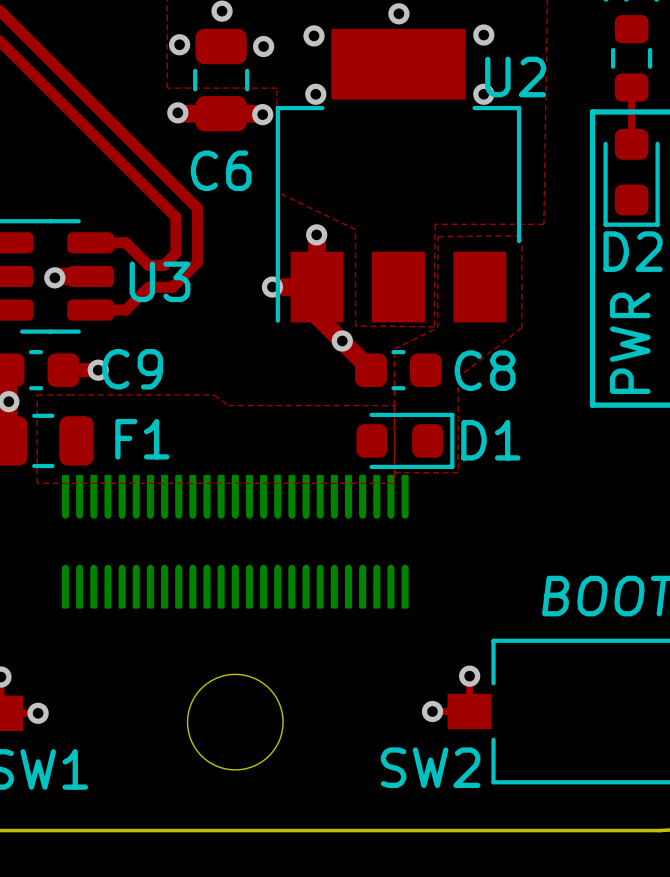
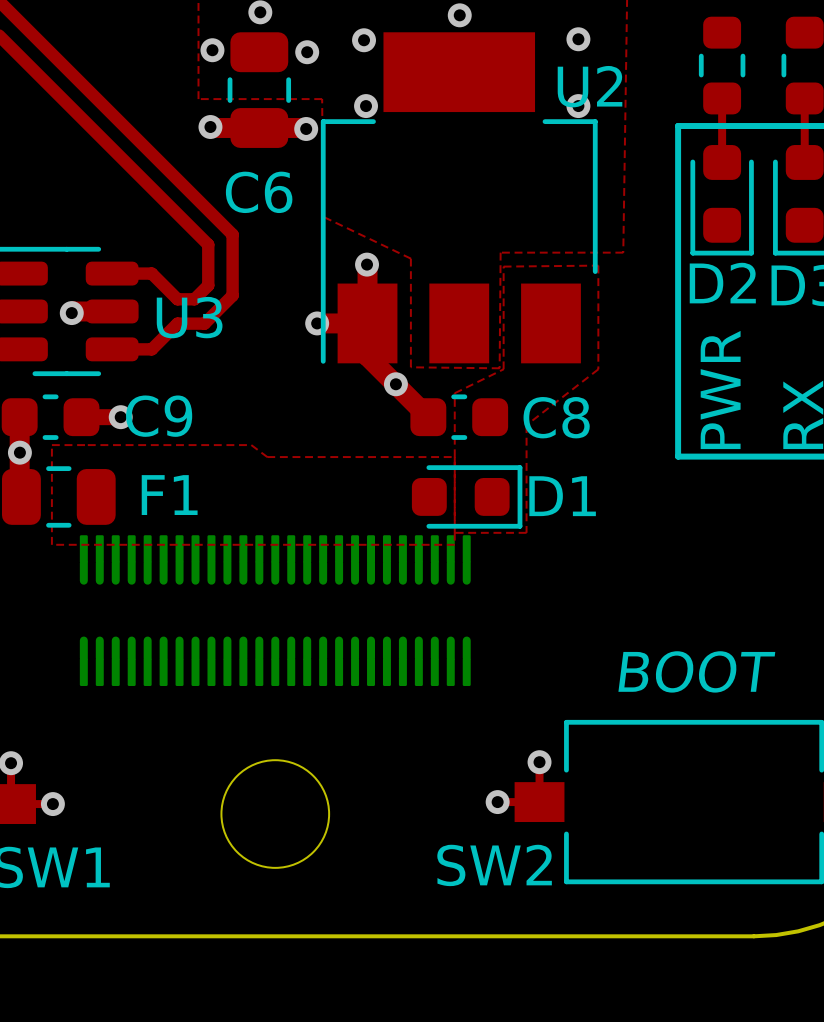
via position: (483, 35) -> (578, 39)
via position: (483, 94) -> (578, 106)

